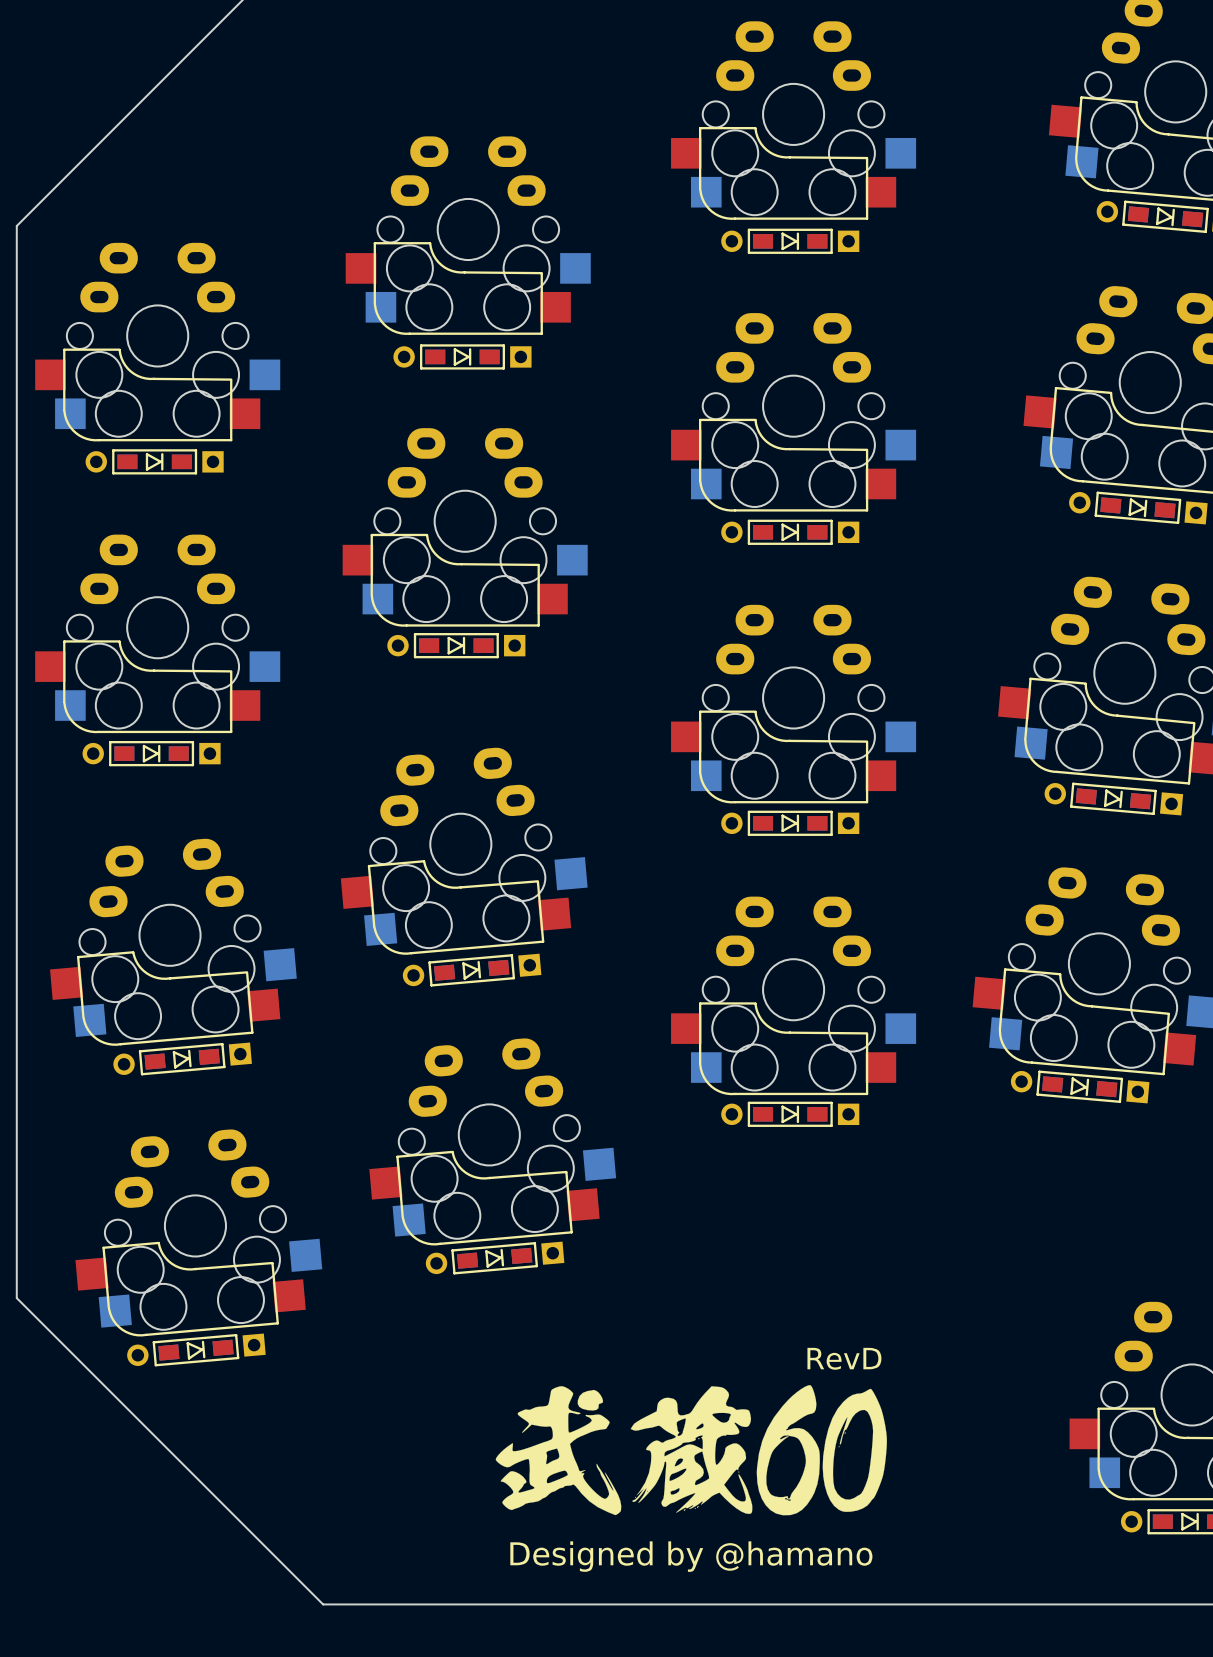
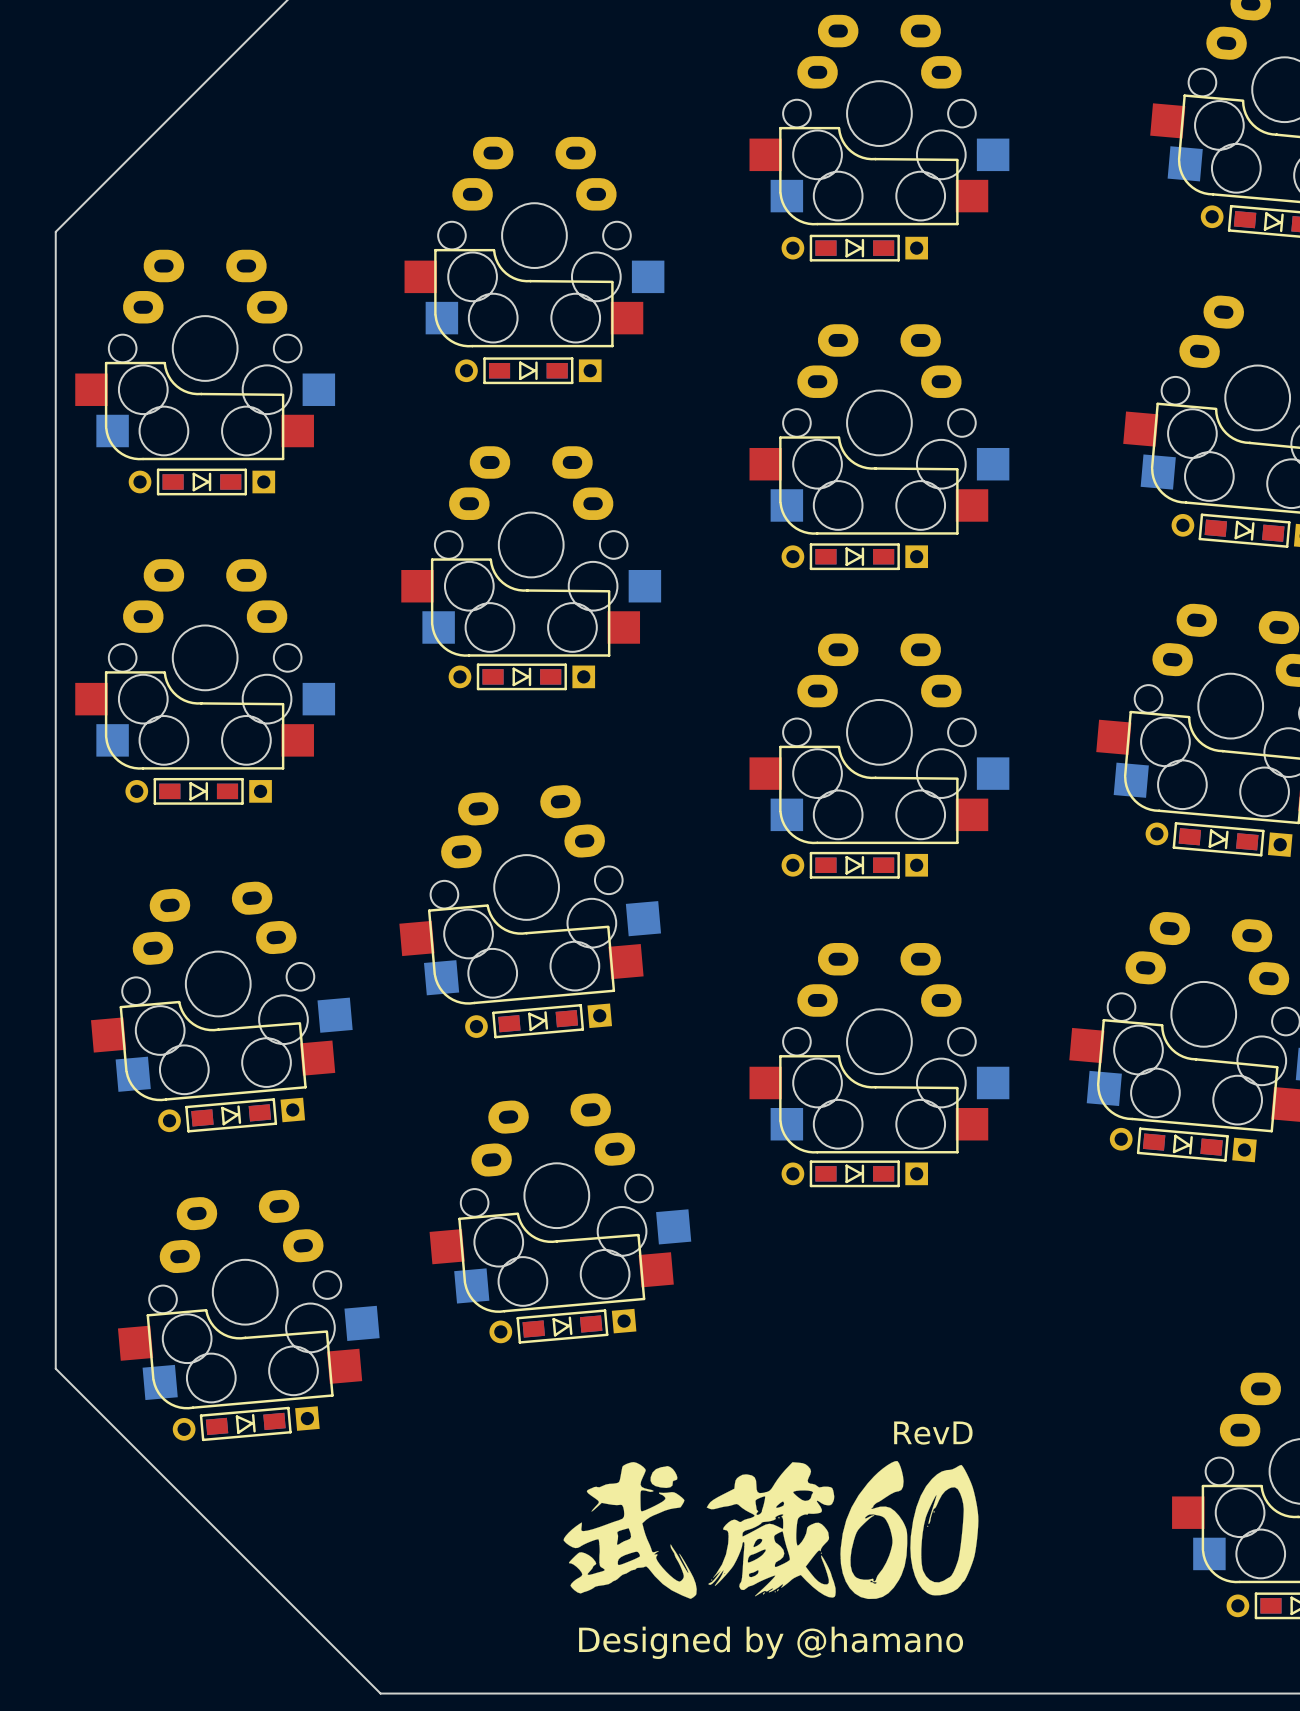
part position: (790, 241) -> (854, 248)
part position: (790, 532) -> (854, 556)
part position: (790, 823) -> (854, 865)
part position: (790, 1114) -> (854, 1173)

